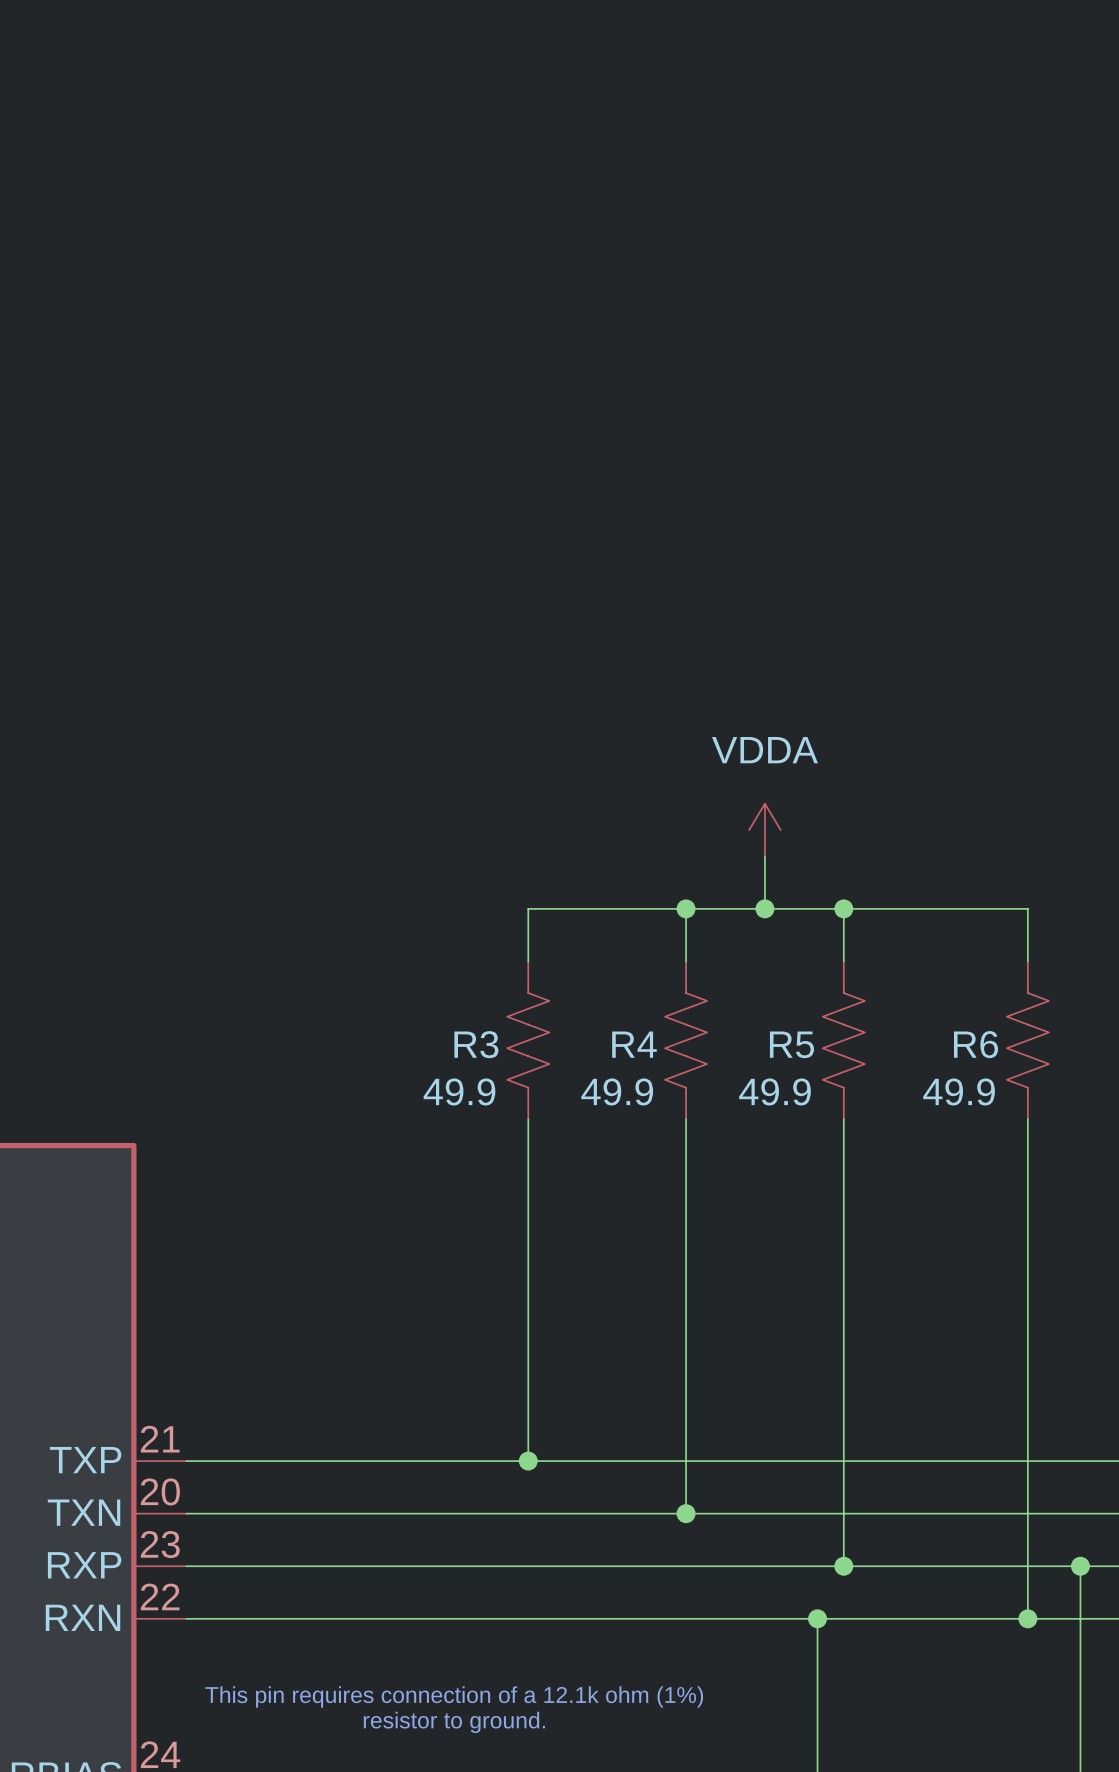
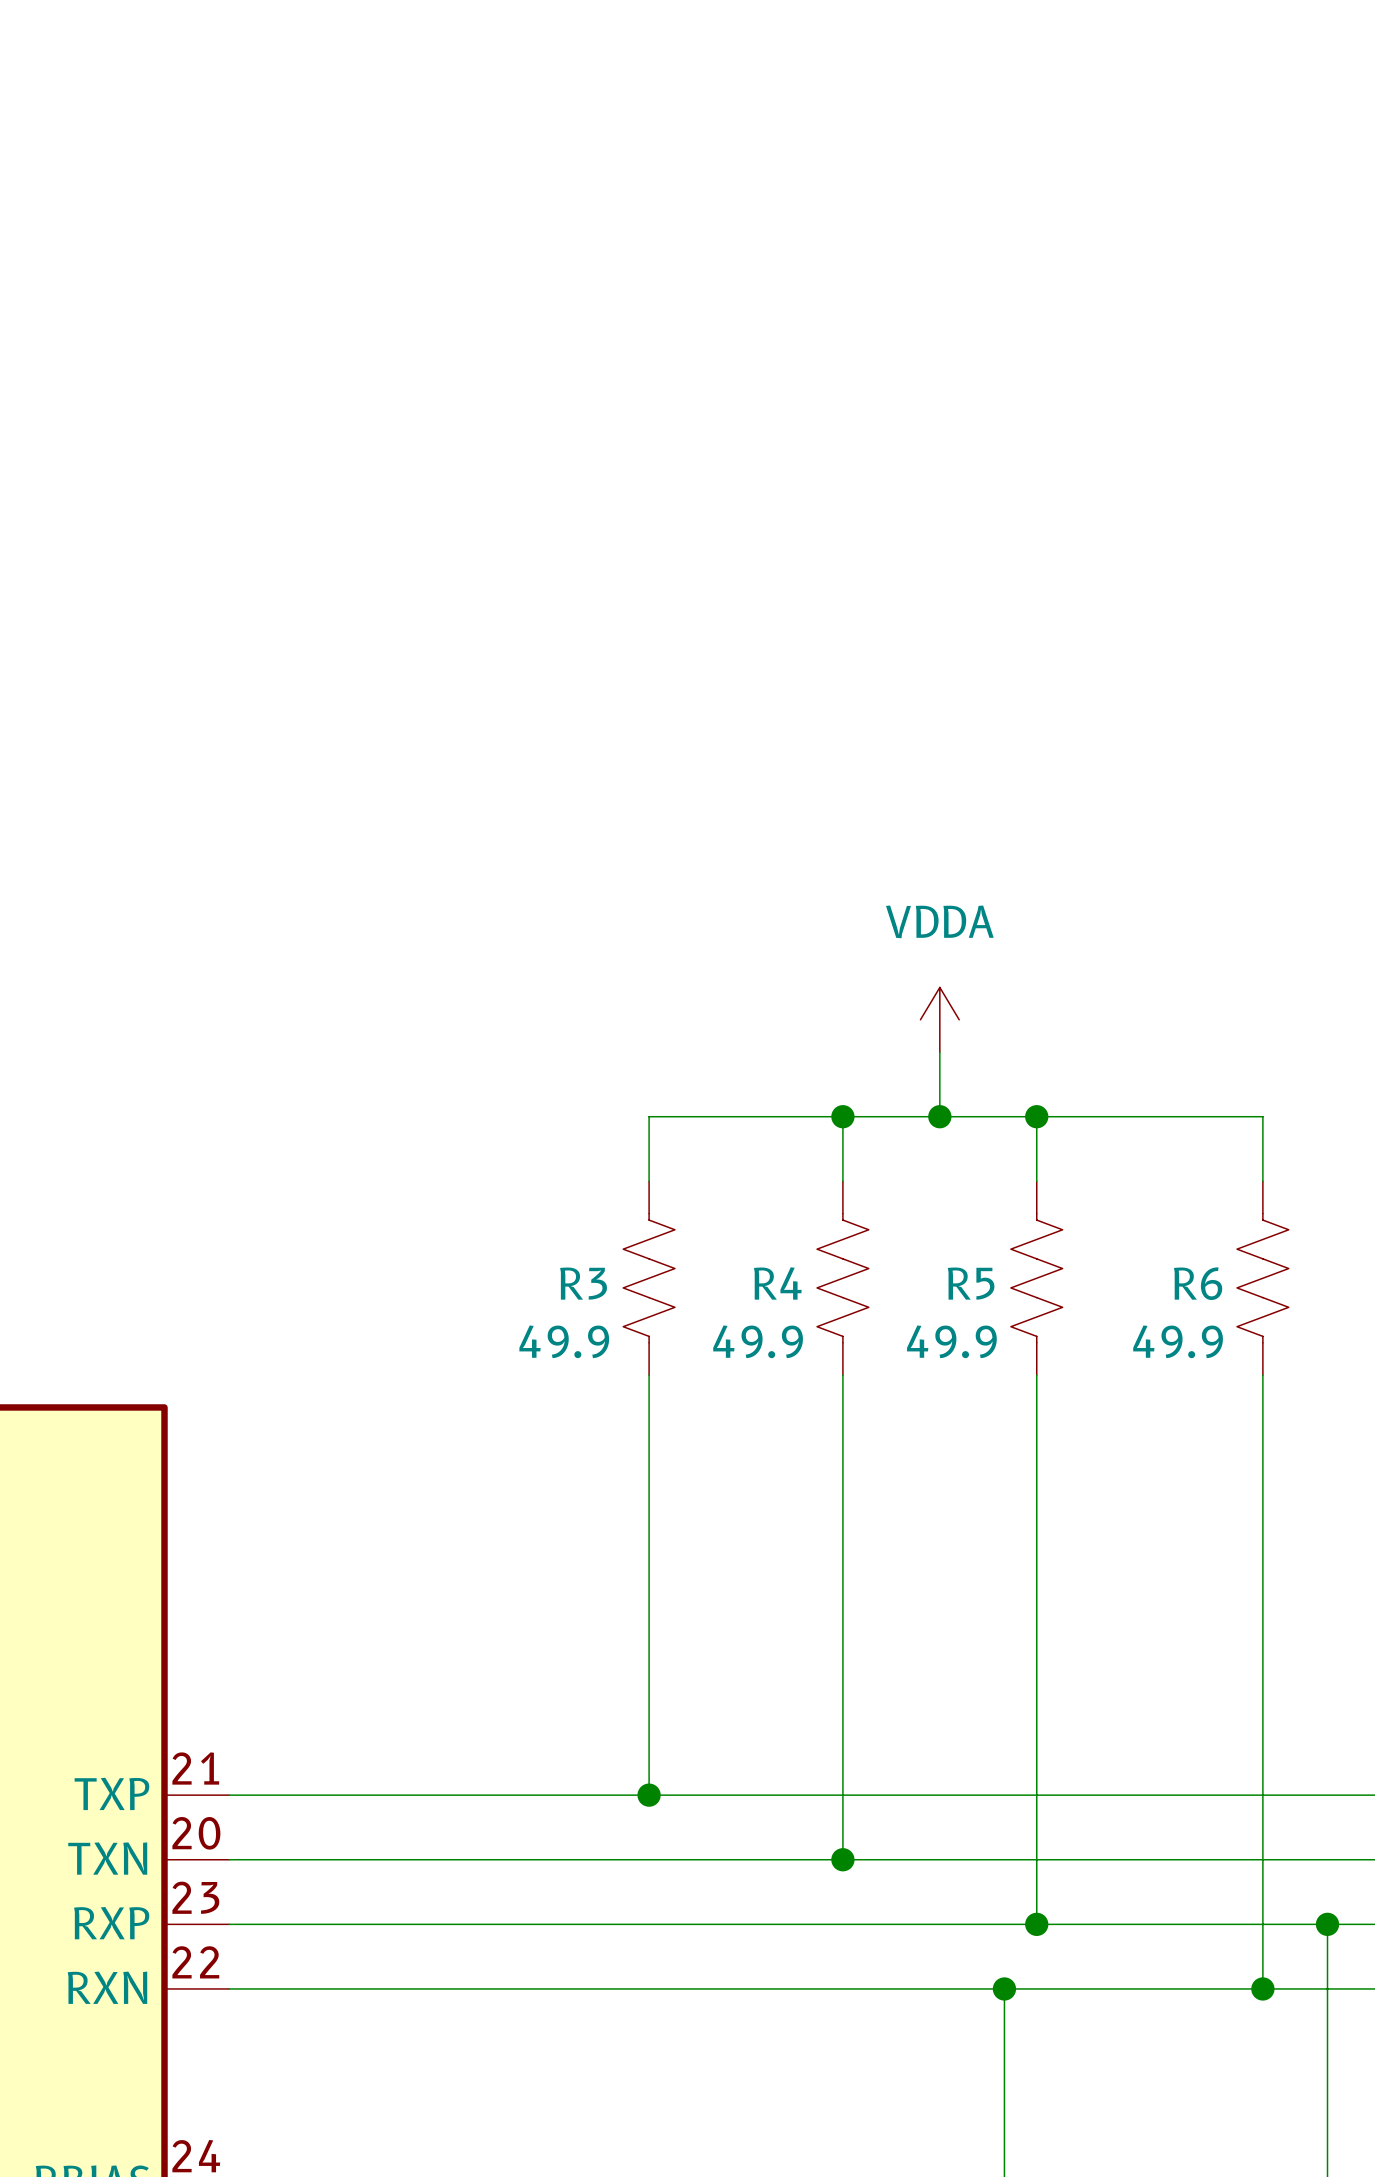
text: This pin requires connection of a 12.1k ohm (1%) (454, 1696) -> none
text: resistor to ground. (454, 1722) -> none

